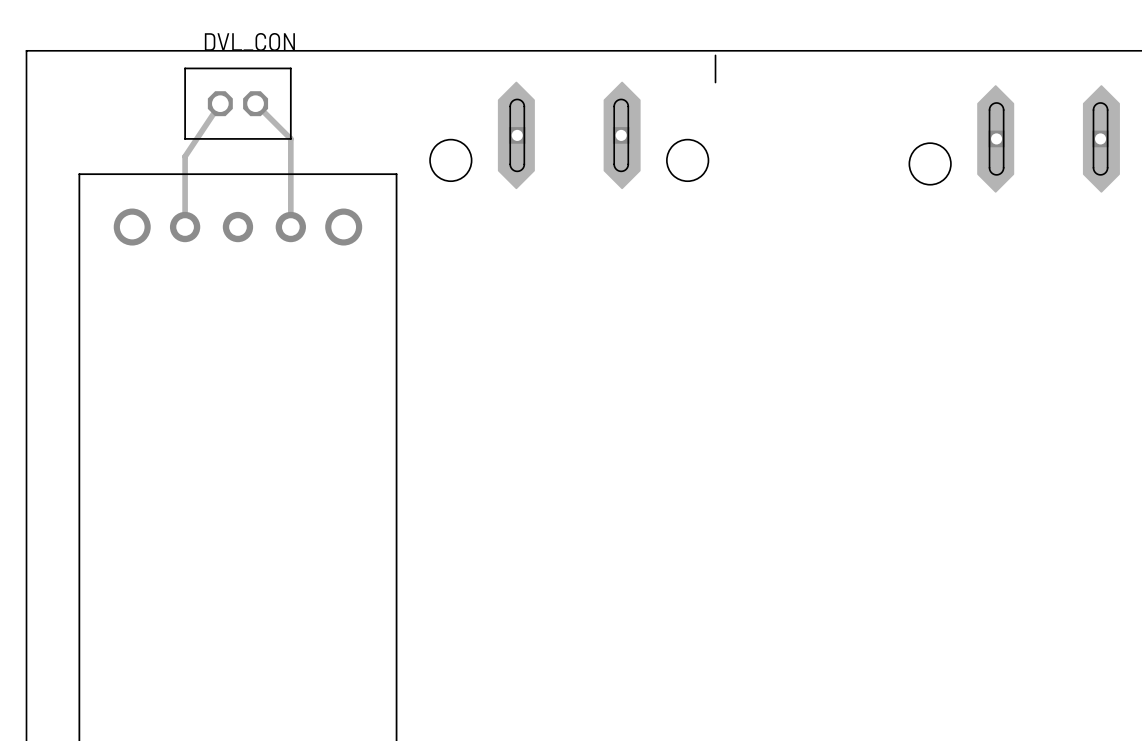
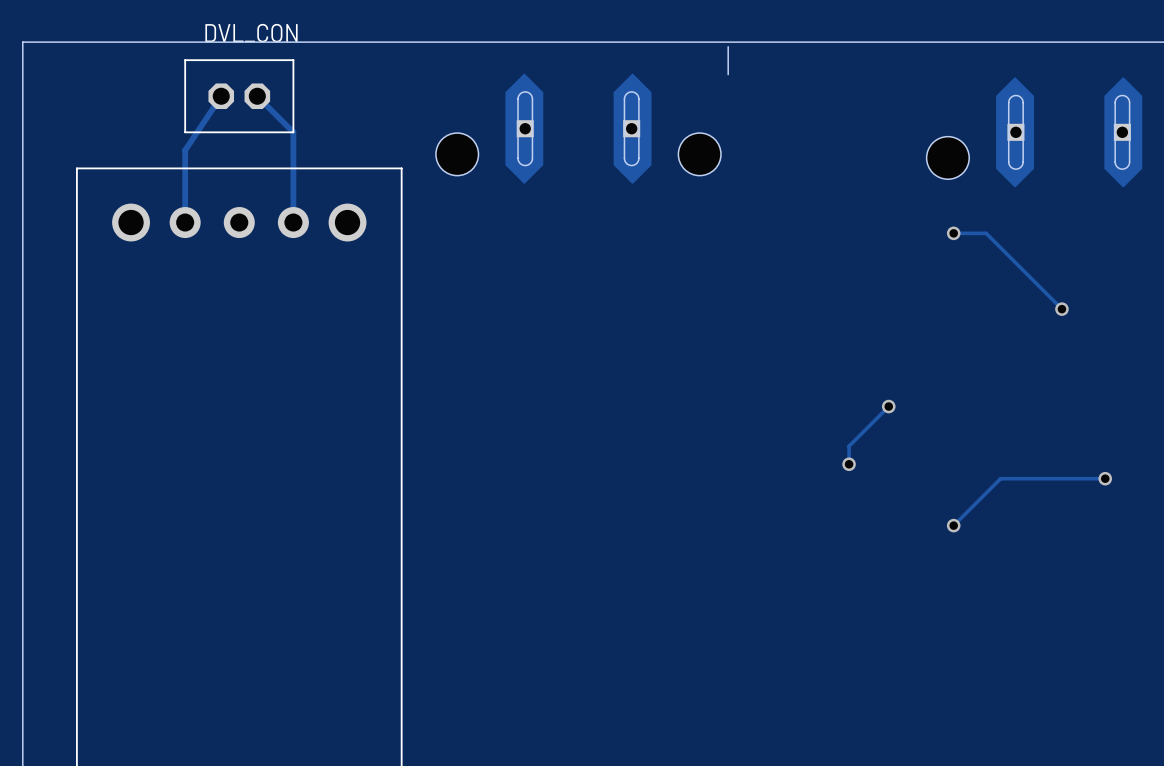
track: none -> (953, 233) (986, 233) (1061, 309)
via: none -> (953, 233)
via: none -> (1061, 309)
track: none -> (888, 406) (849, 446) (849, 464)
via: none -> (888, 406)
via: none -> (849, 464)
track: none -> (1105, 478) (1000, 478) (953, 525)
via: none -> (1105, 478)
via: none -> (953, 525)

